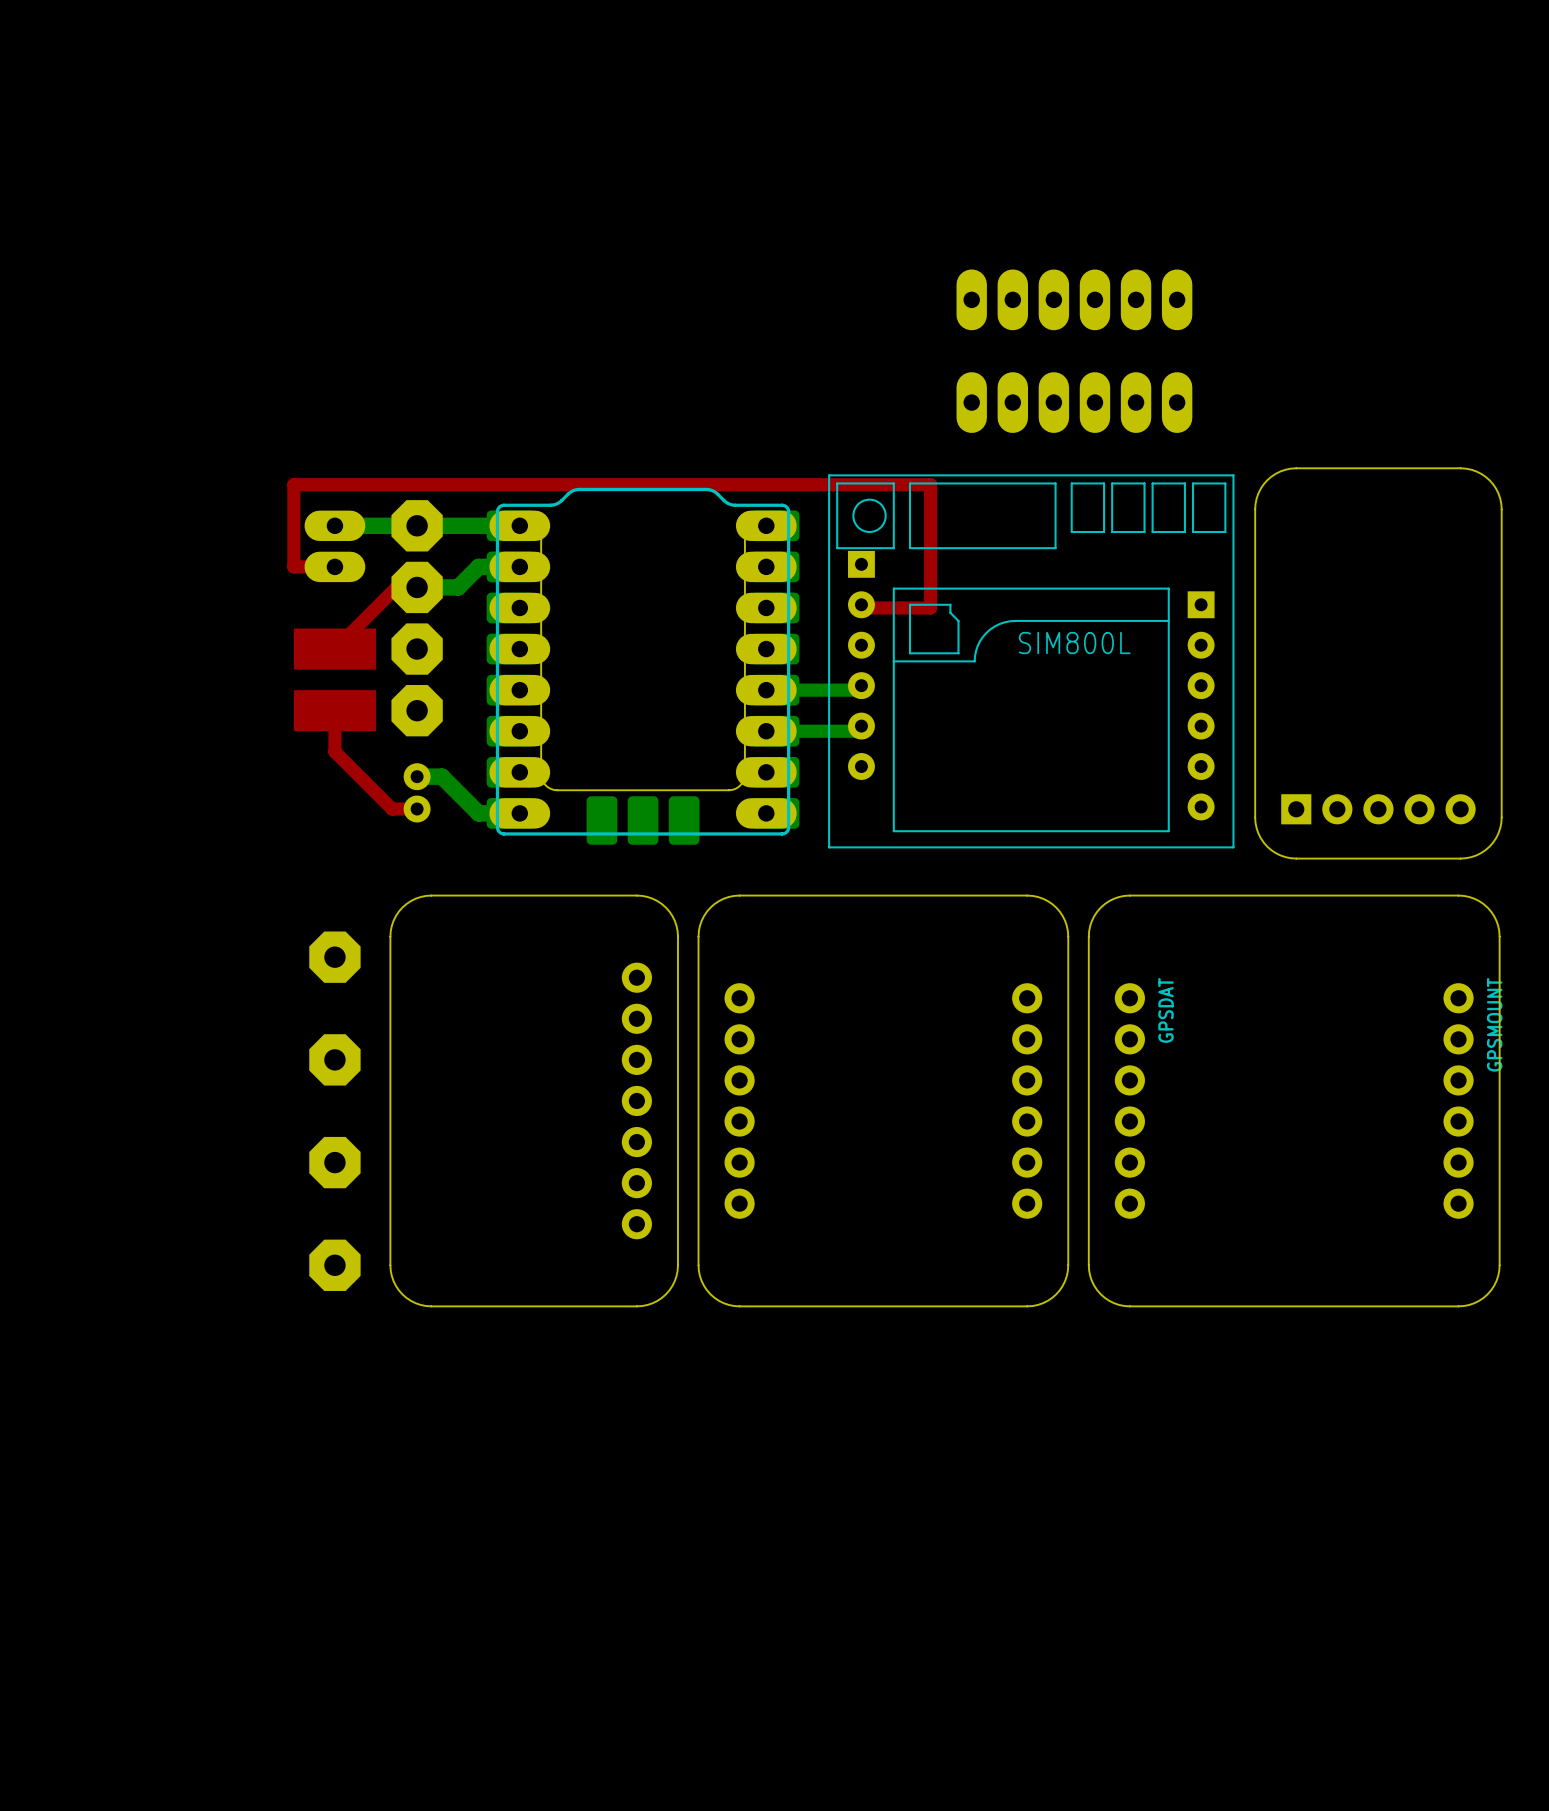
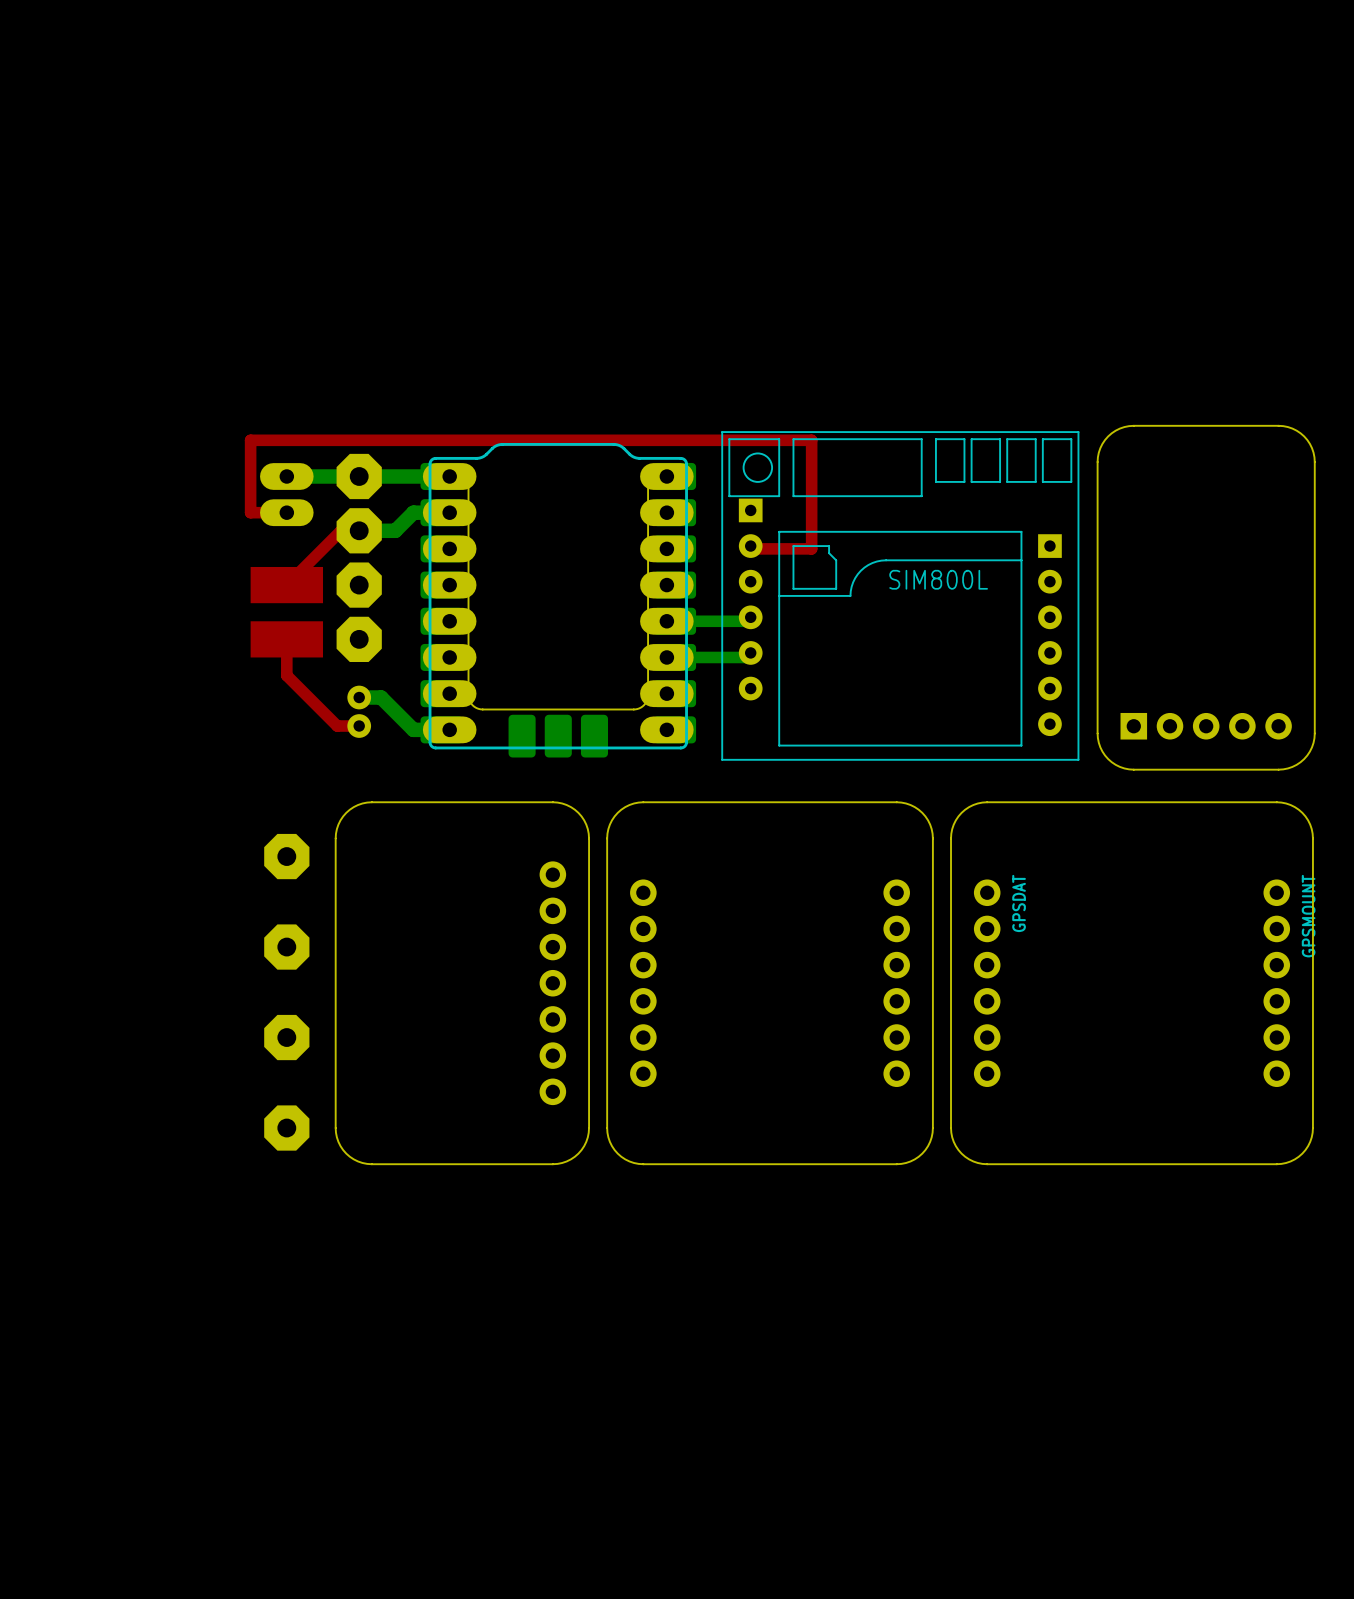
part: (1074, 299) -> none
part: (1074, 402) -> none

